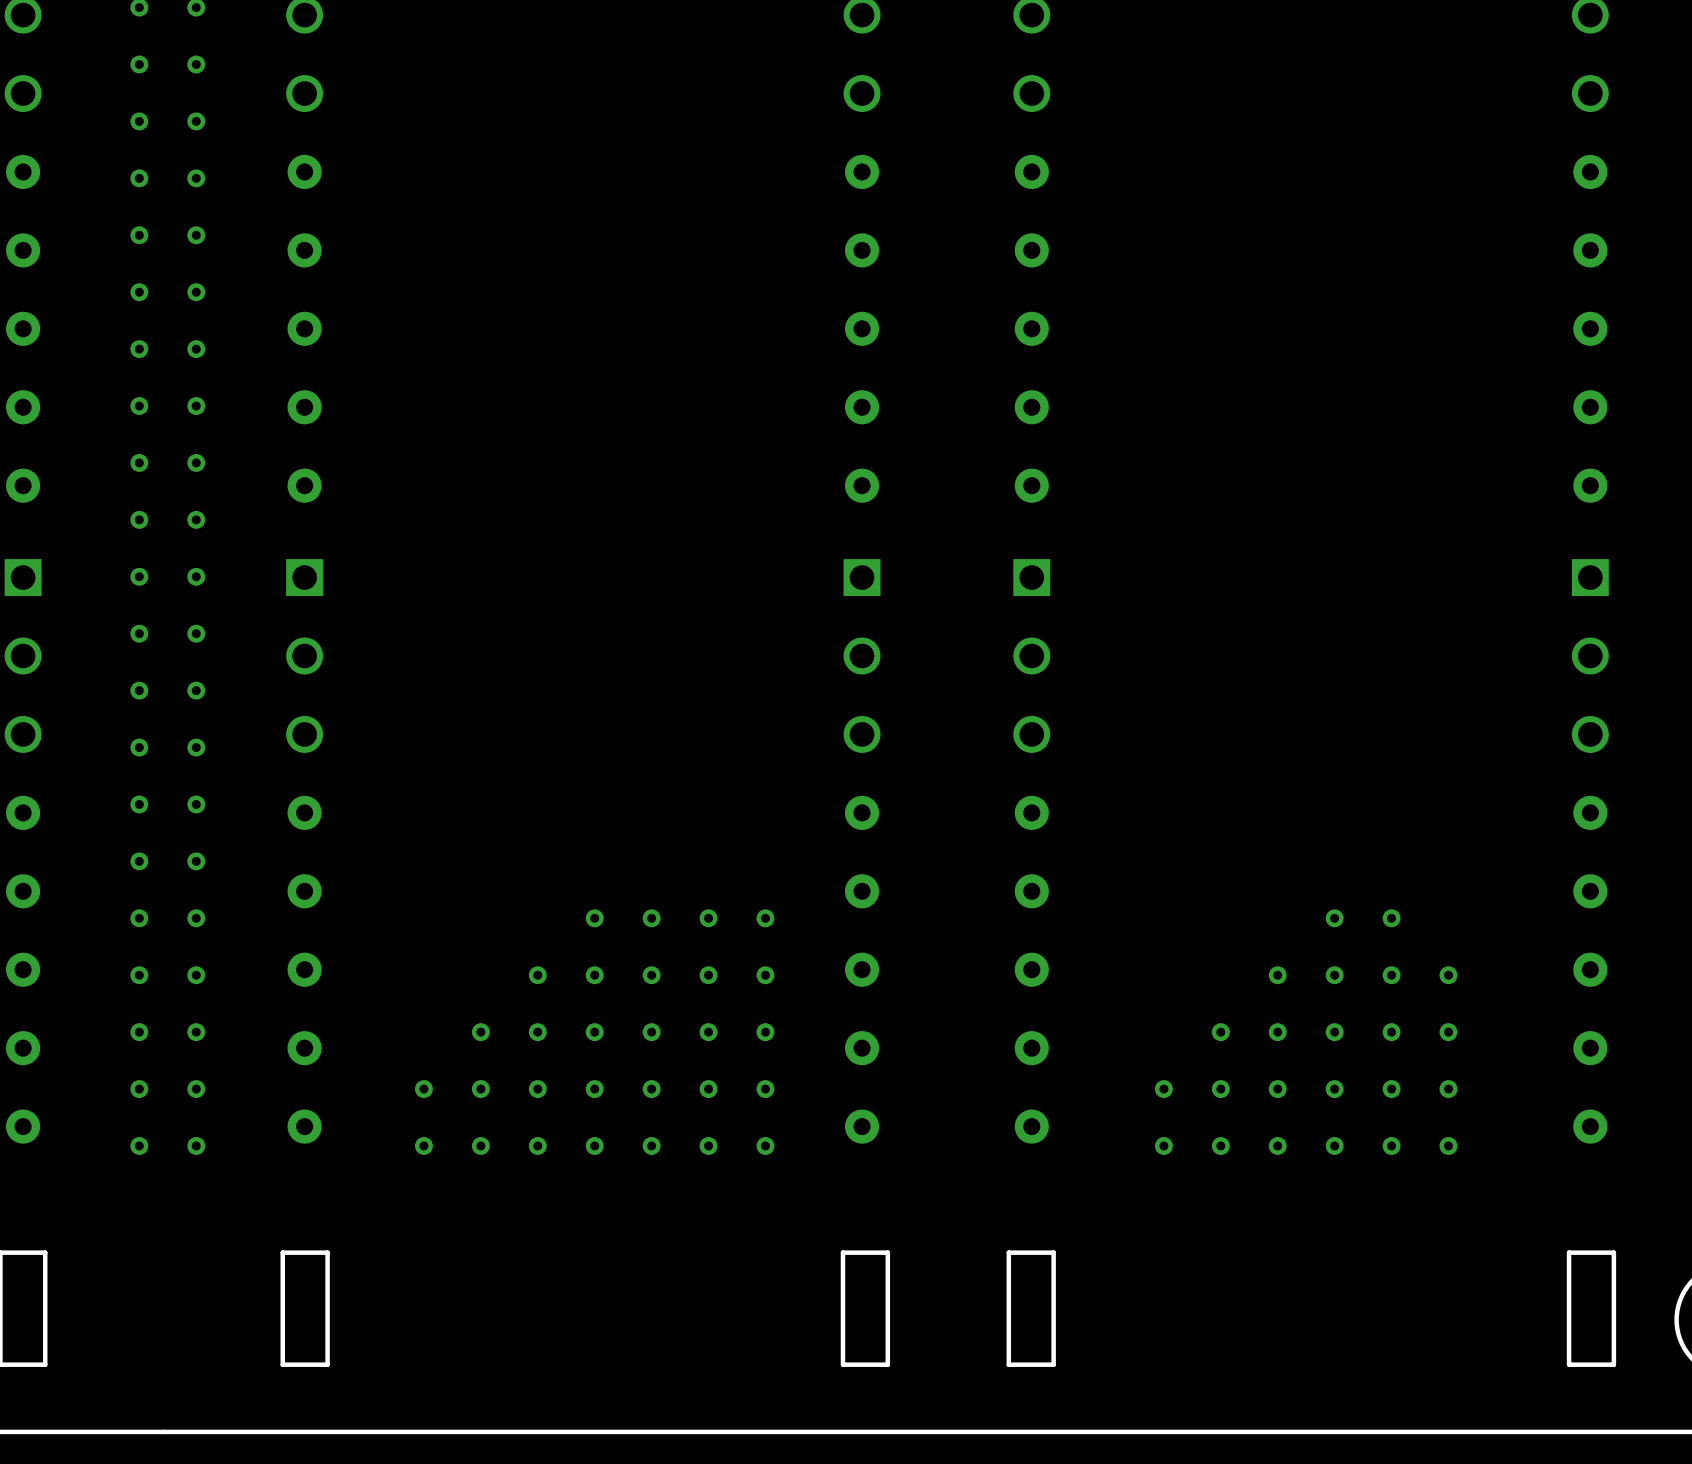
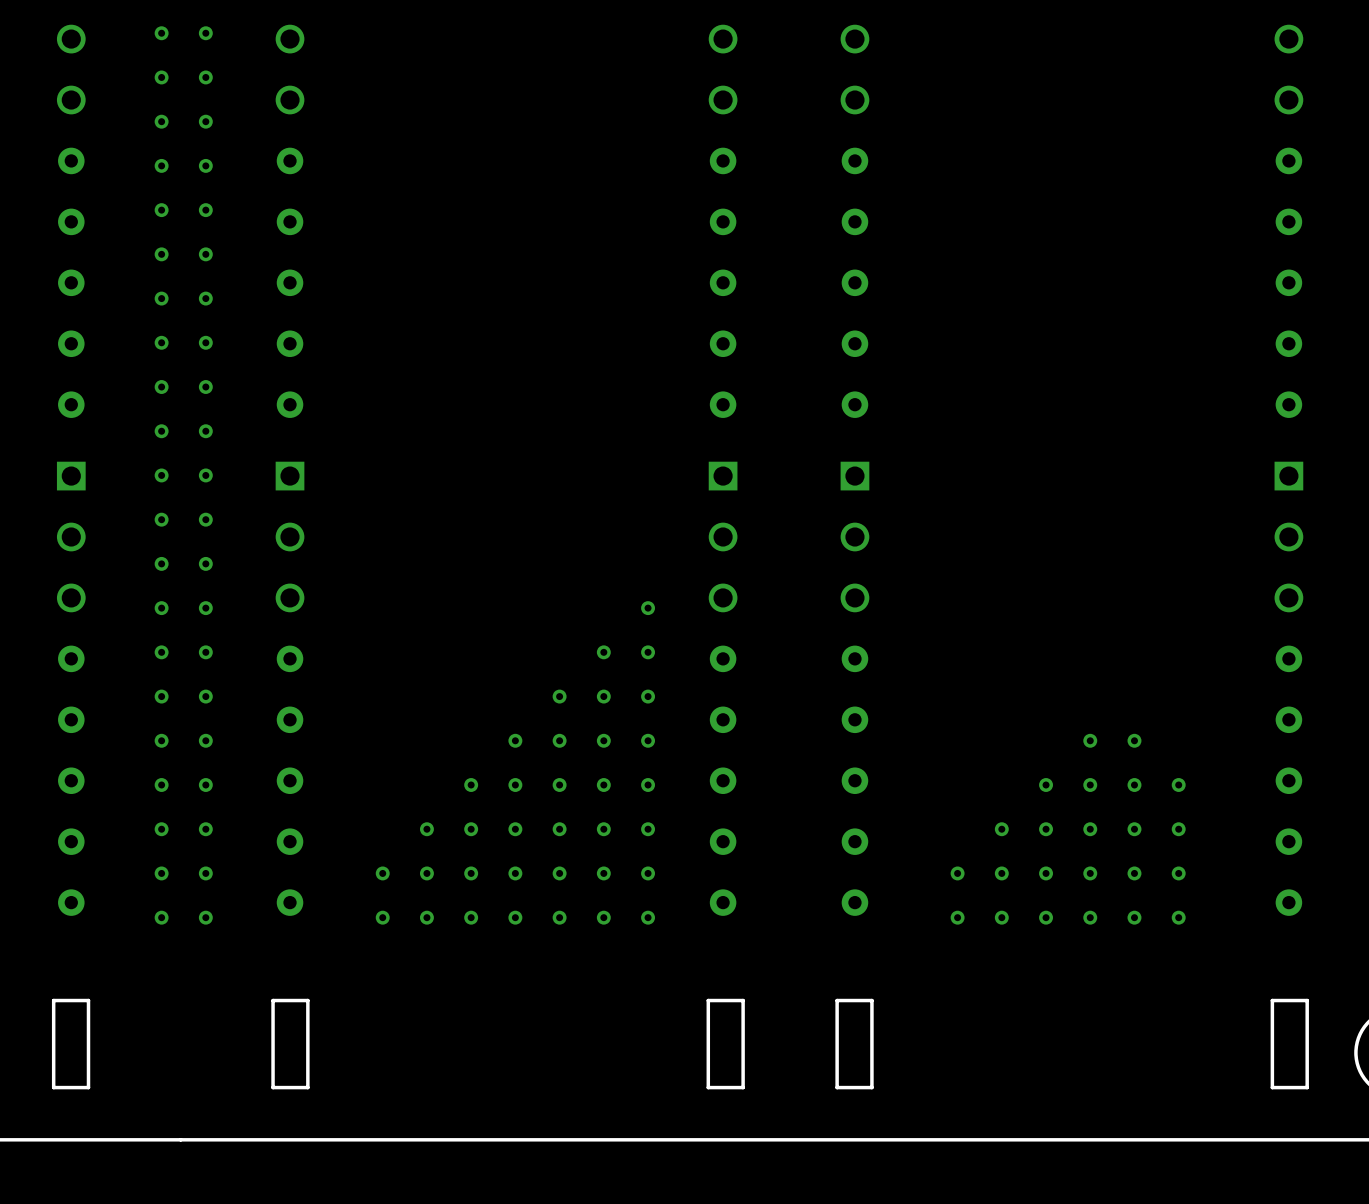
via: none -> (648, 608)
via: none -> (603, 652)
via: none -> (648, 652)
via: none -> (559, 696)
via: none -> (603, 696)
via: none -> (648, 696)

